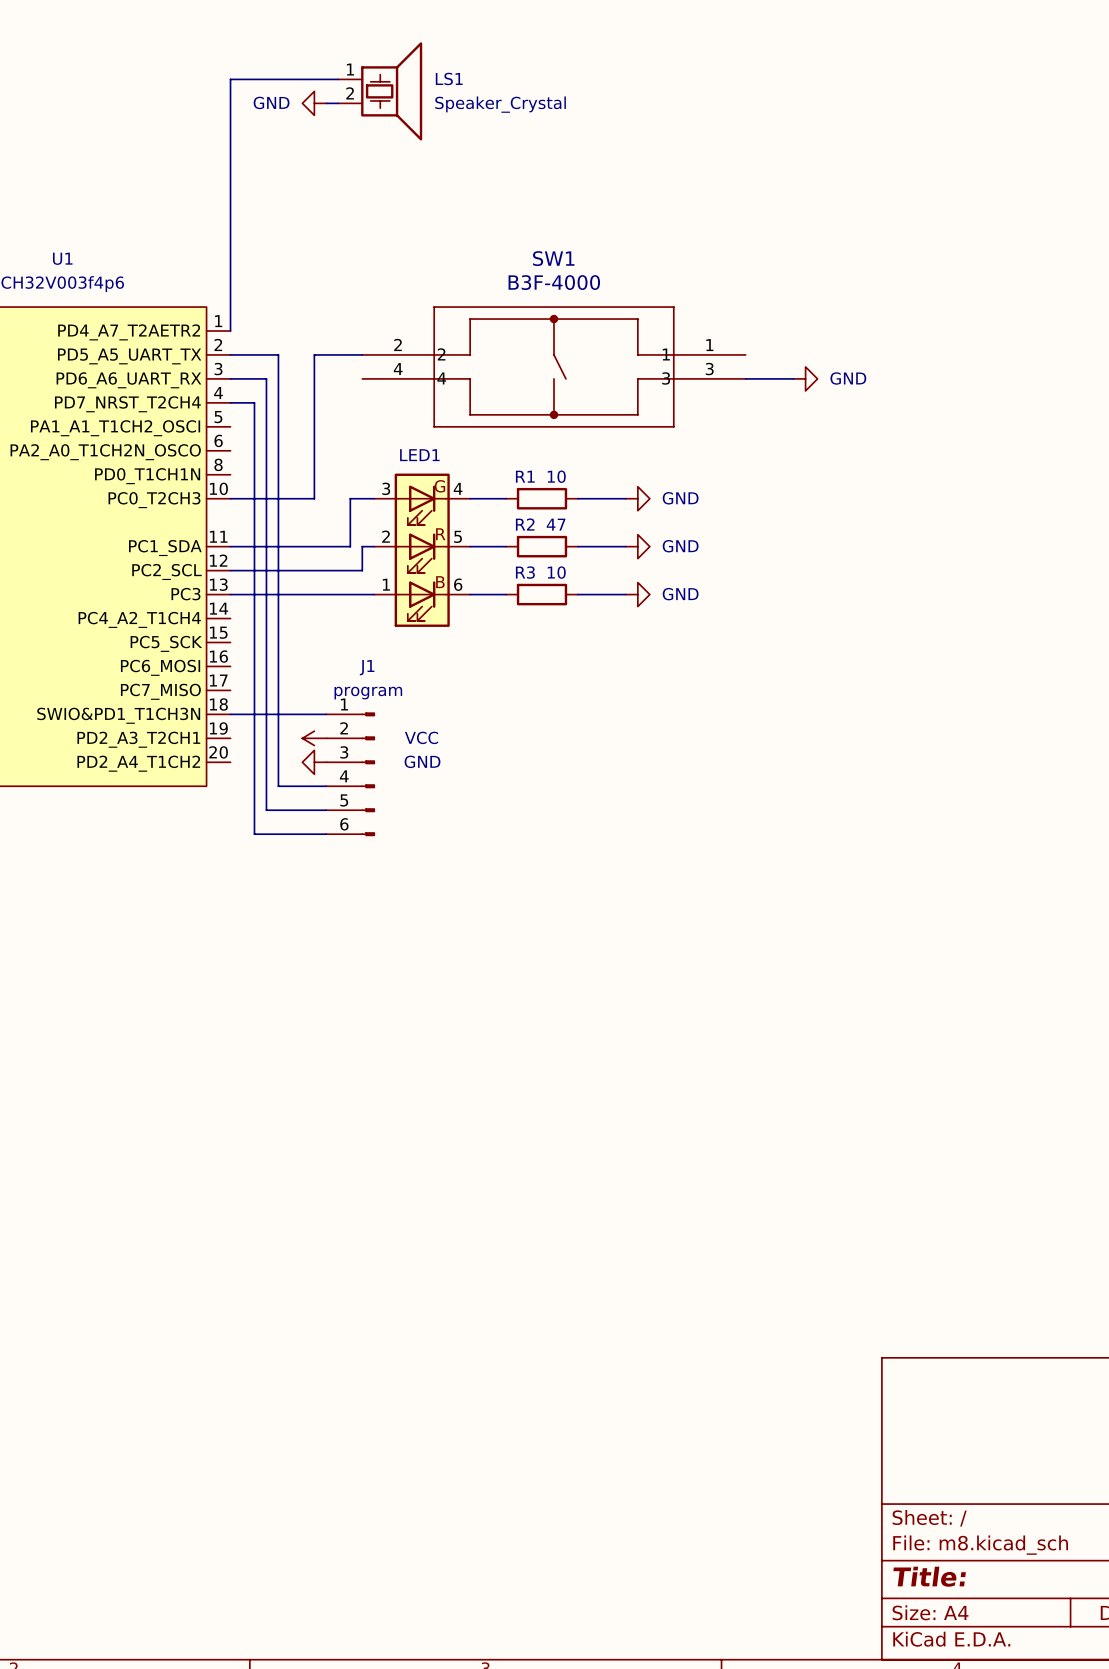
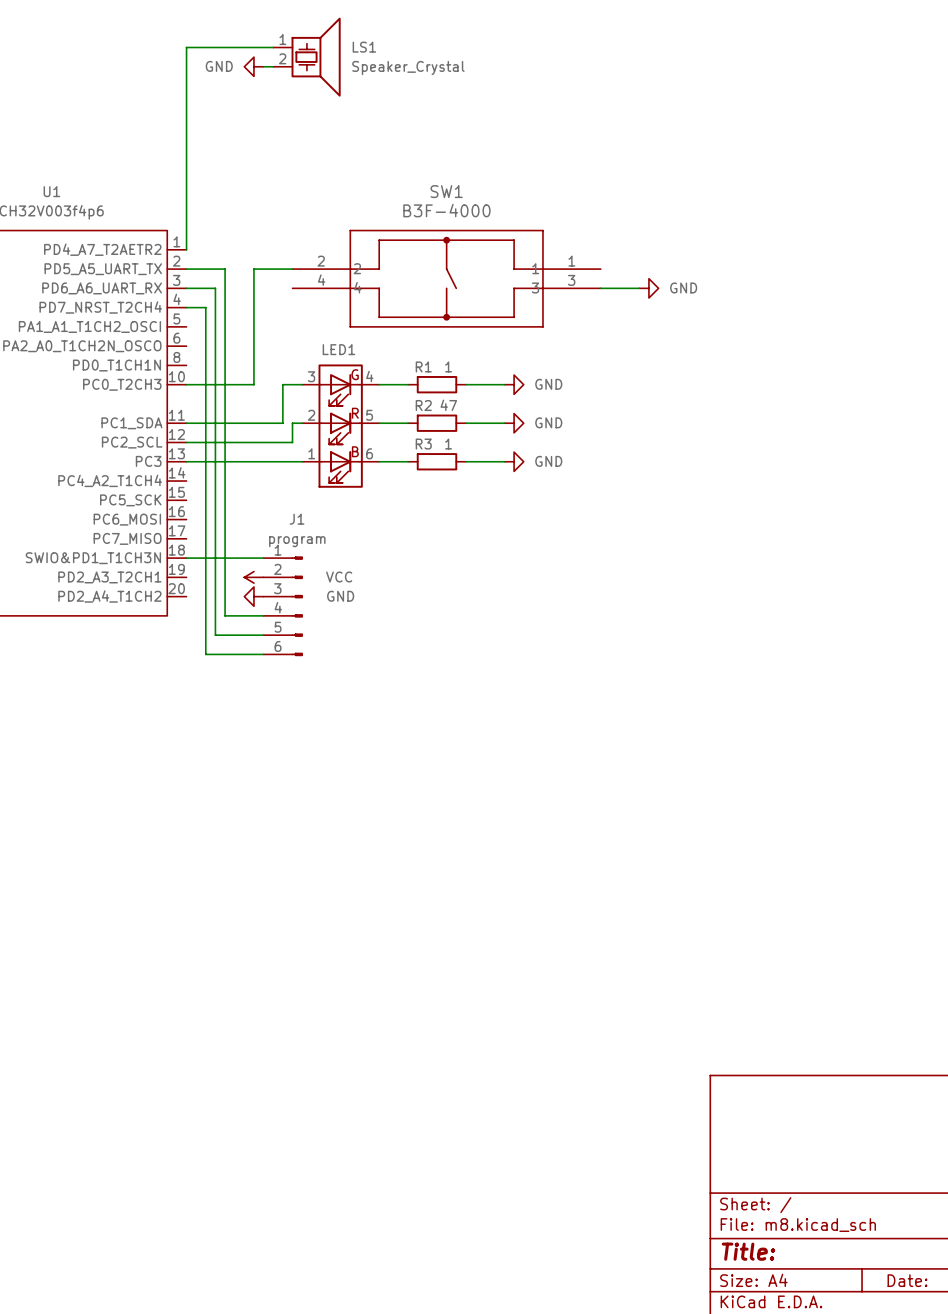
R1 value: 10 (556, 476) -> 1 (448, 366)
R3 value: 10 (556, 572) -> 1 (448, 444)

